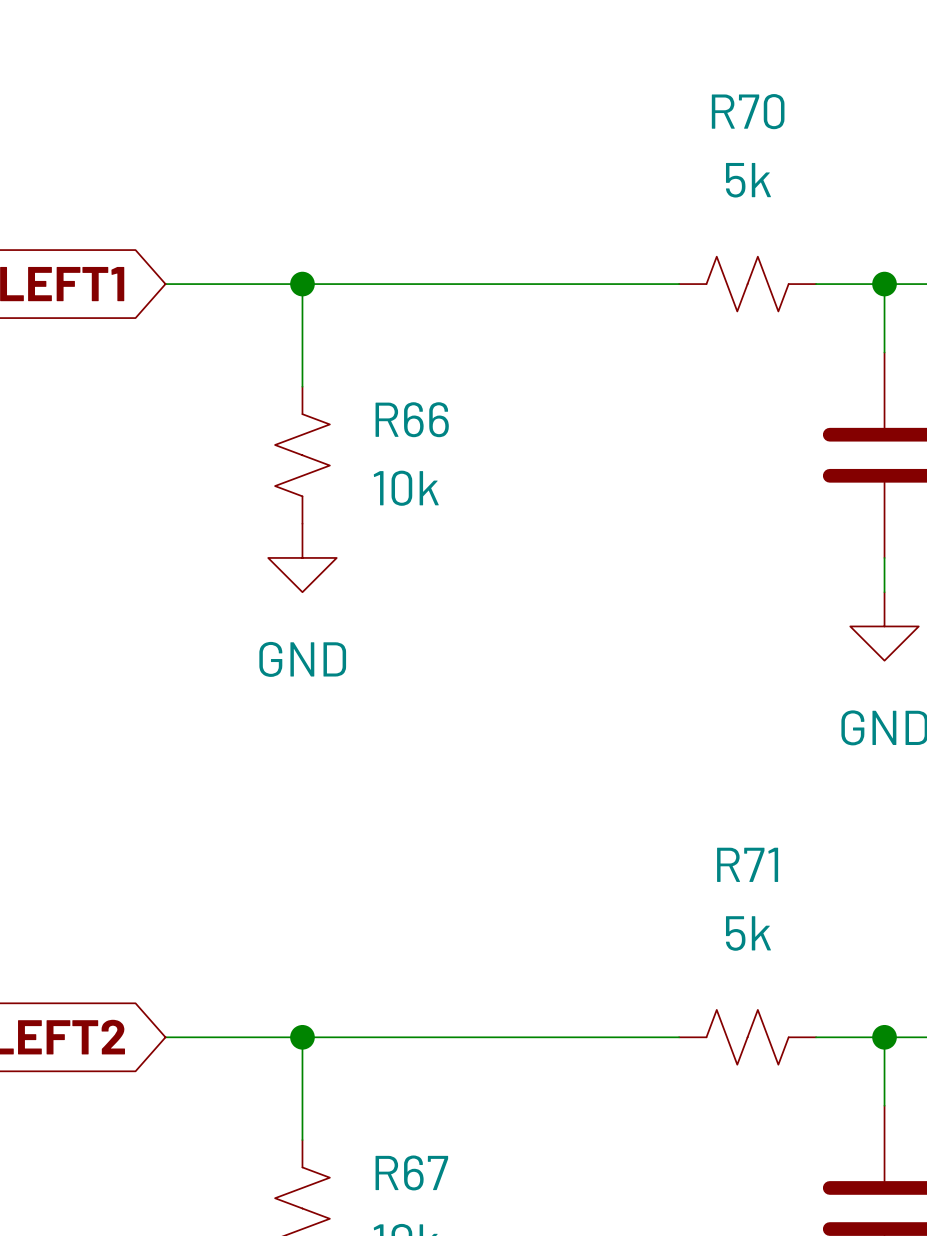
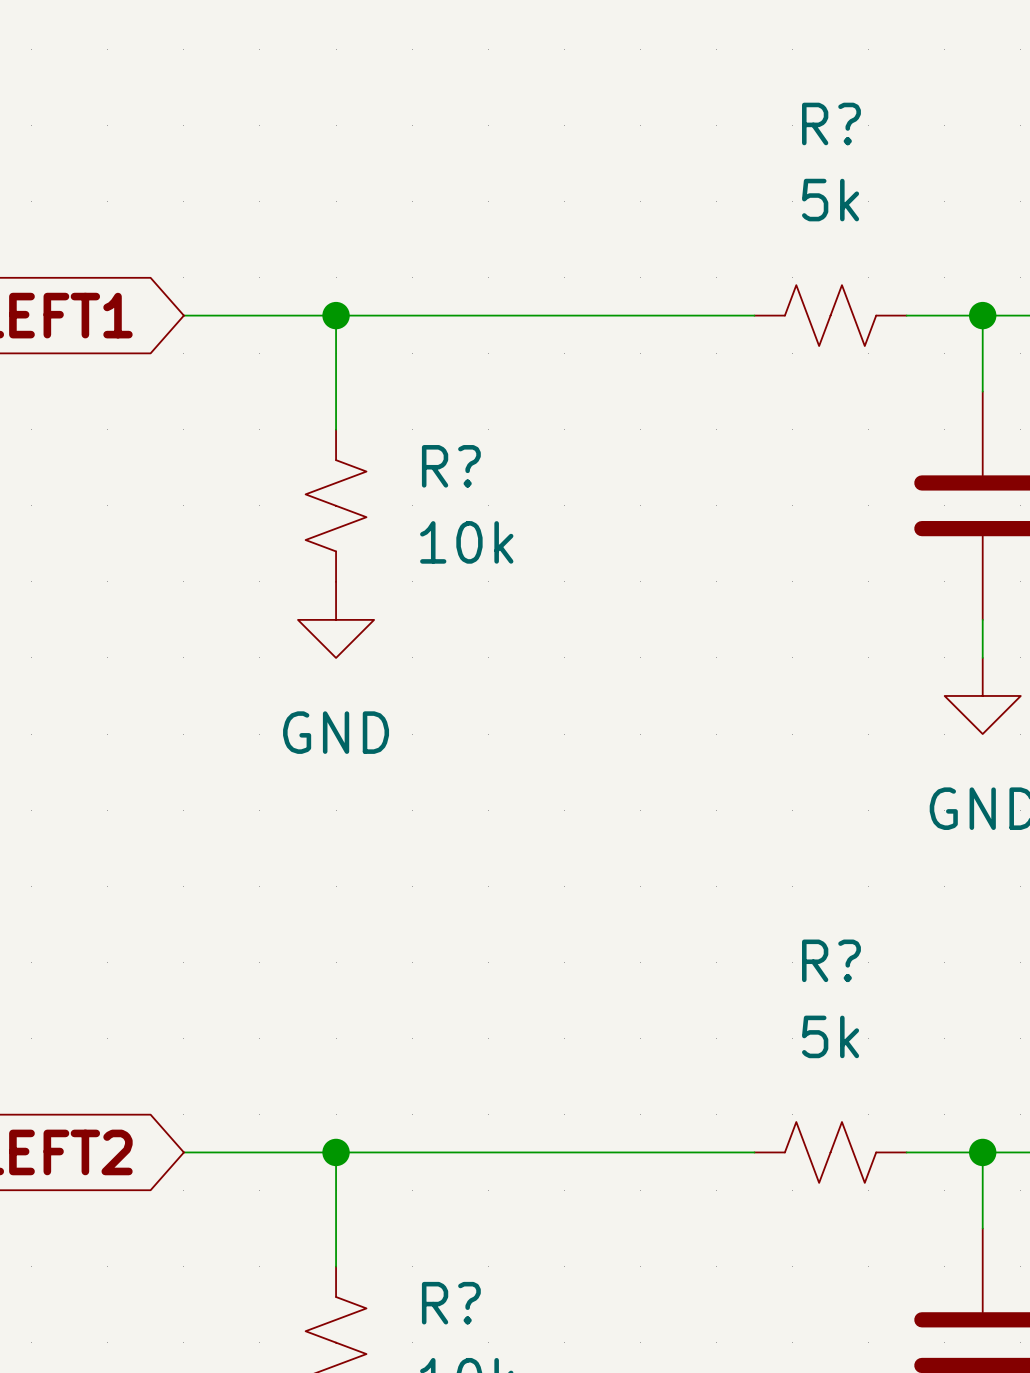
R70 name: R70 (748, 111) -> R? (831, 123)
R66 name: R66 (412, 419) -> R? (451, 466)
R71 name: R71 (747, 864) -> R? (831, 960)
R67 name: R67 (411, 1172) -> R? (451, 1303)

